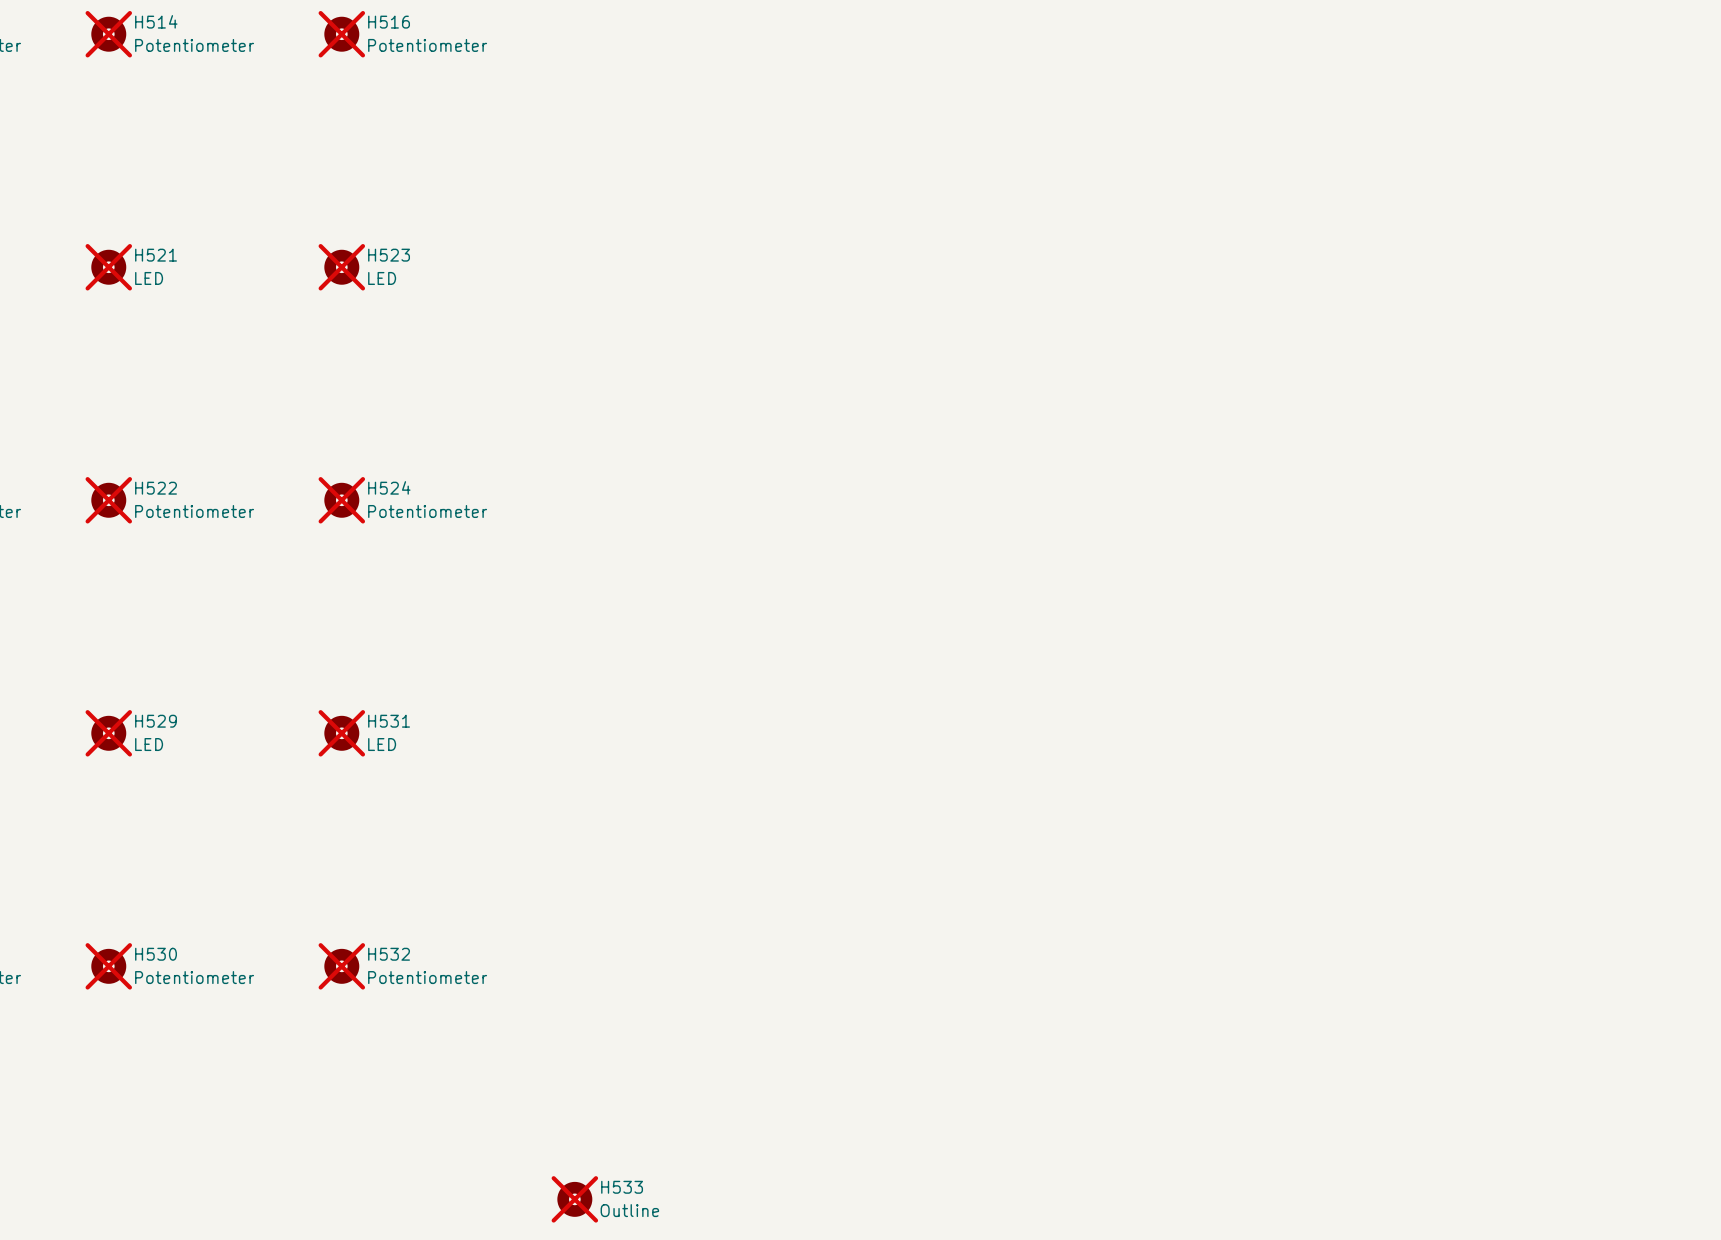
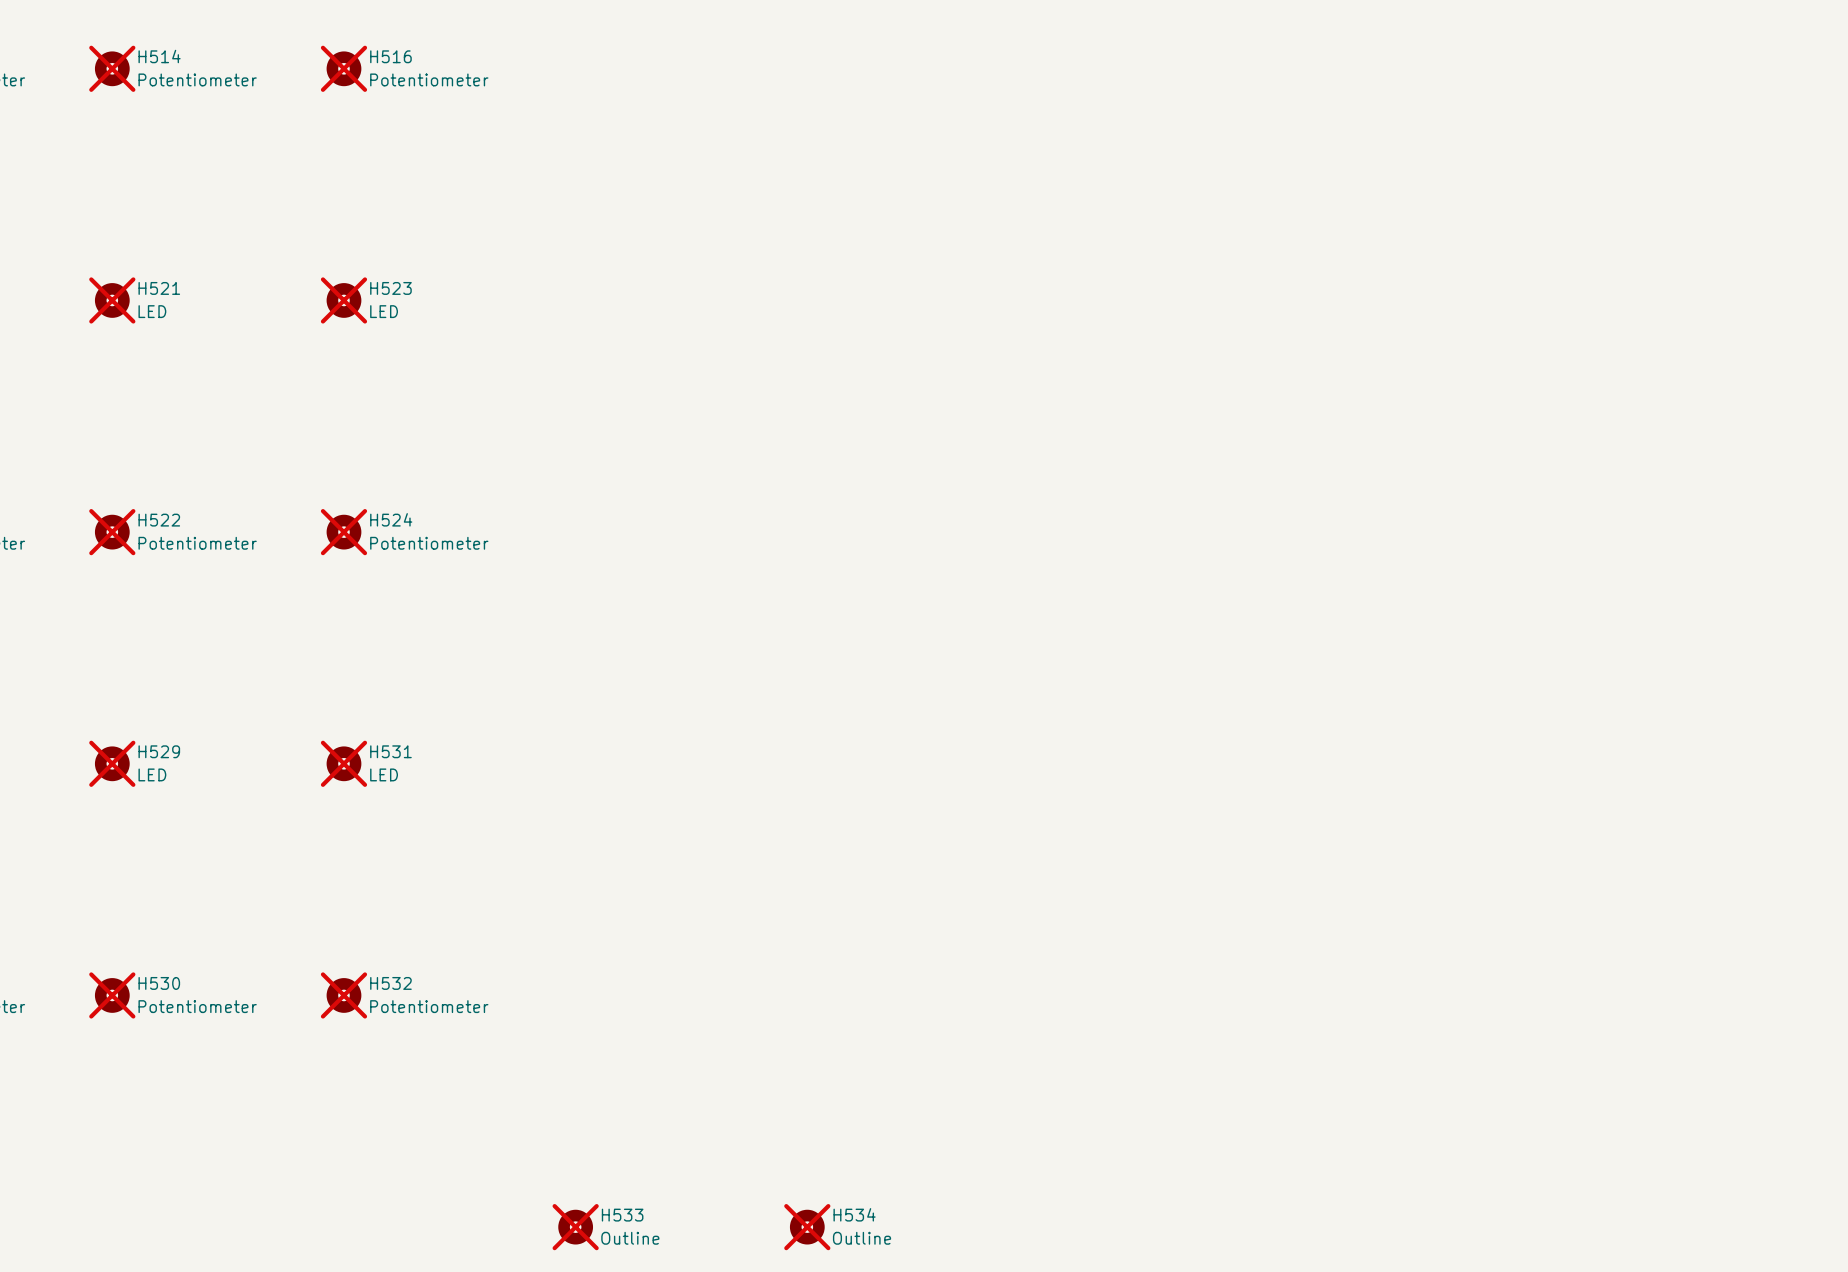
H534: none -> Outline (807, 1227)

